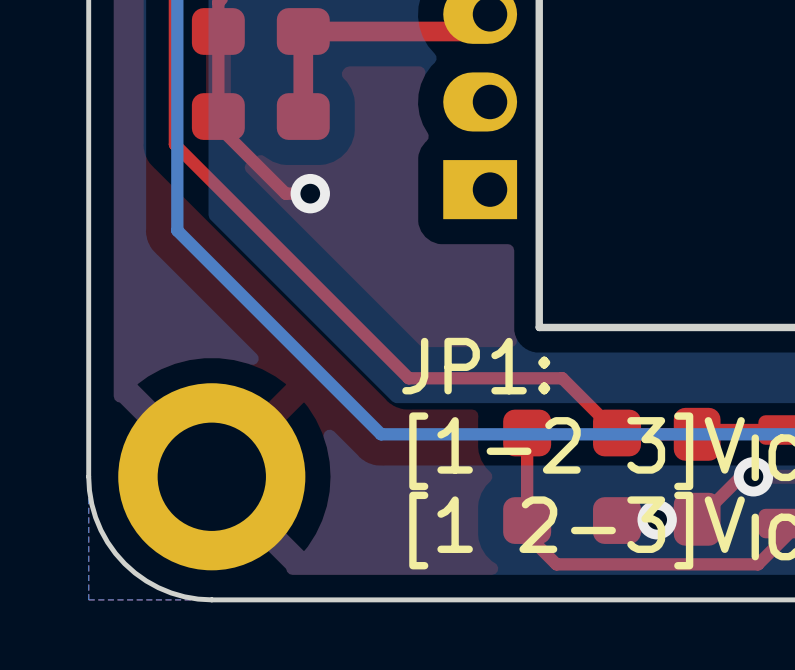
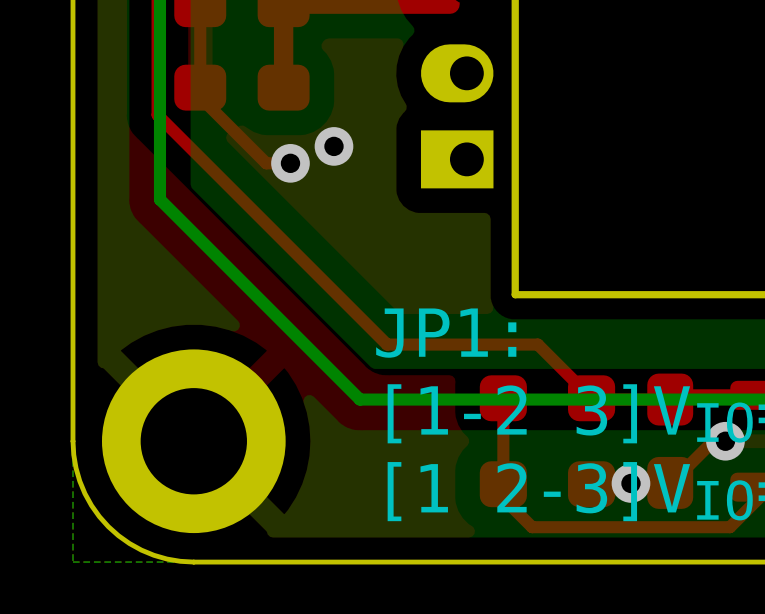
via: none -> (333, 146)

